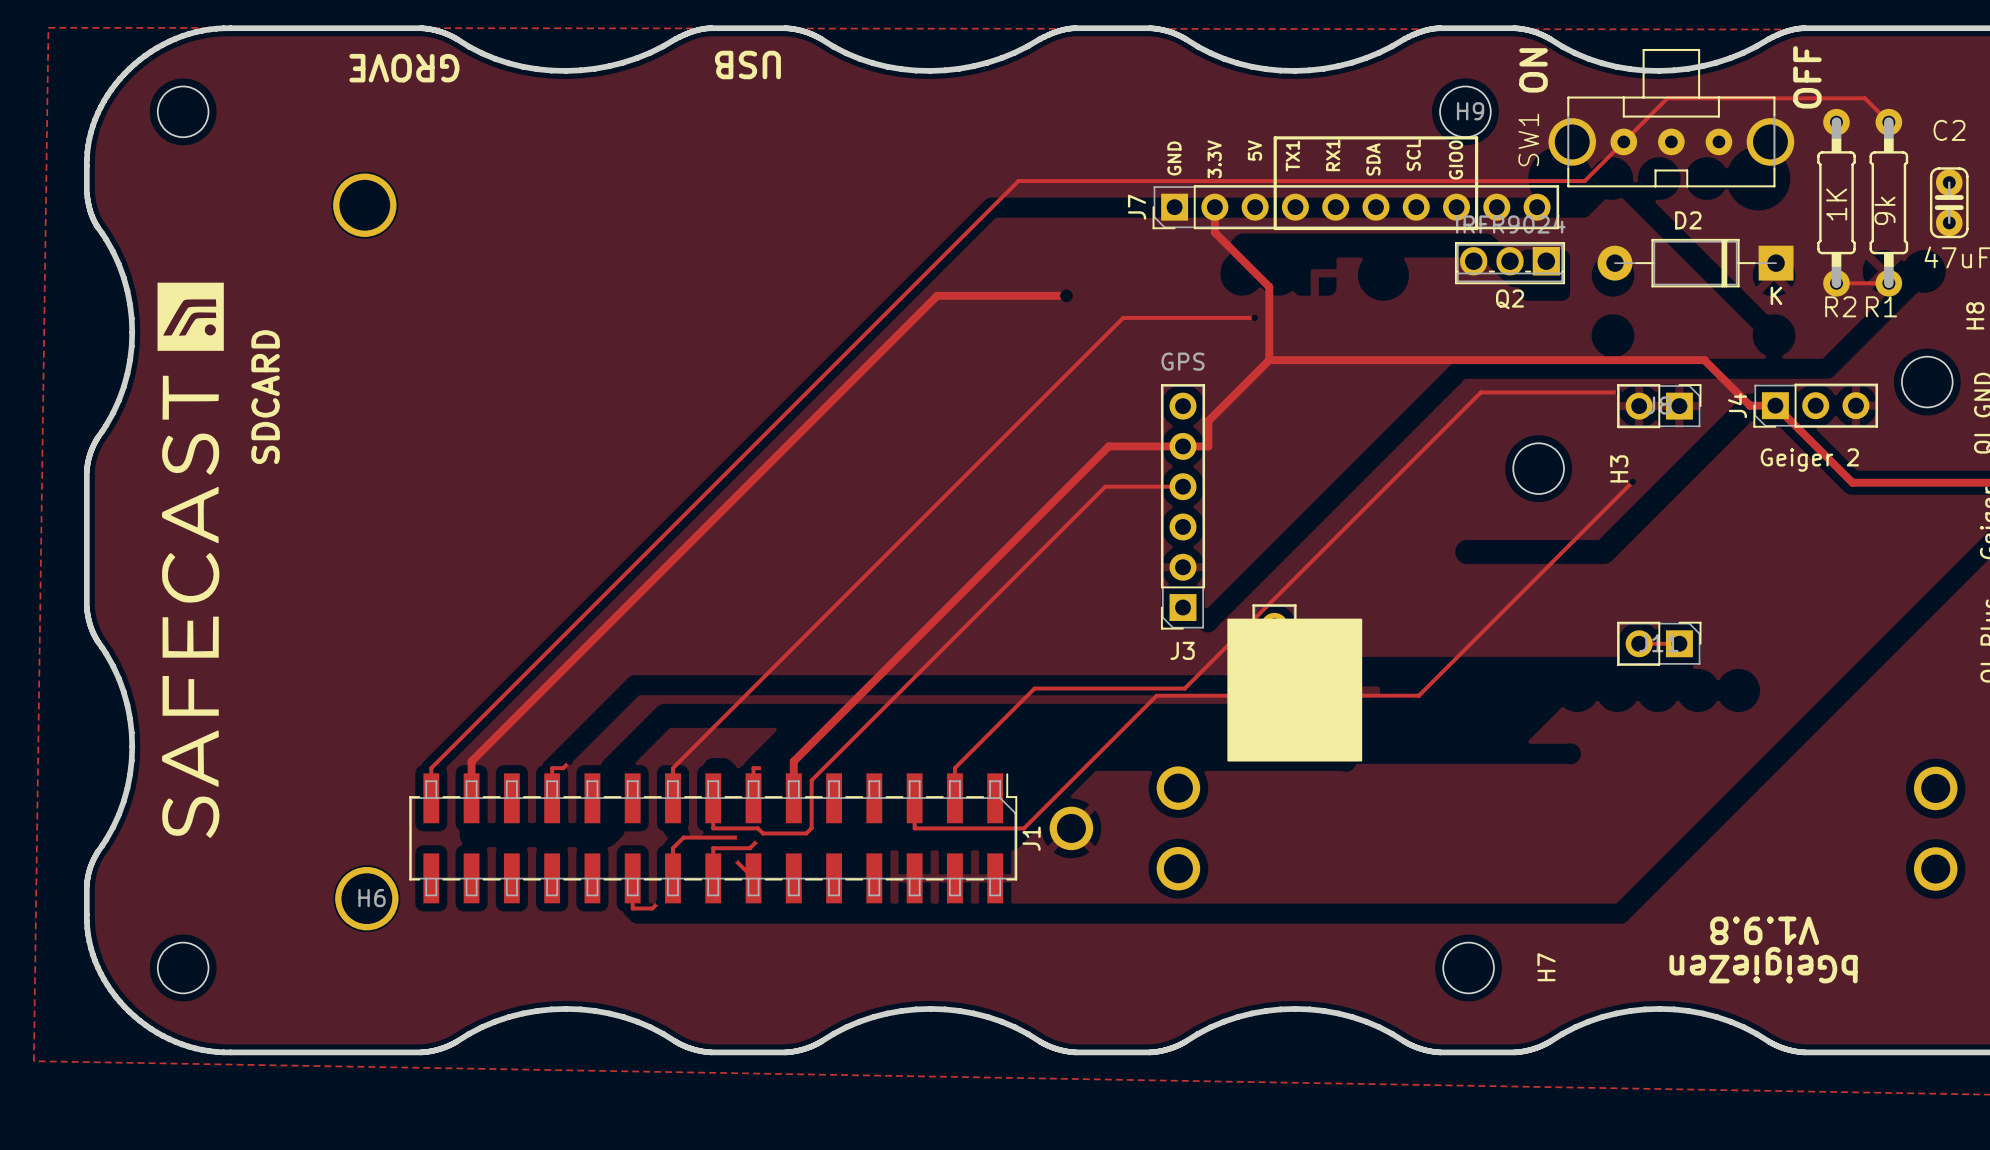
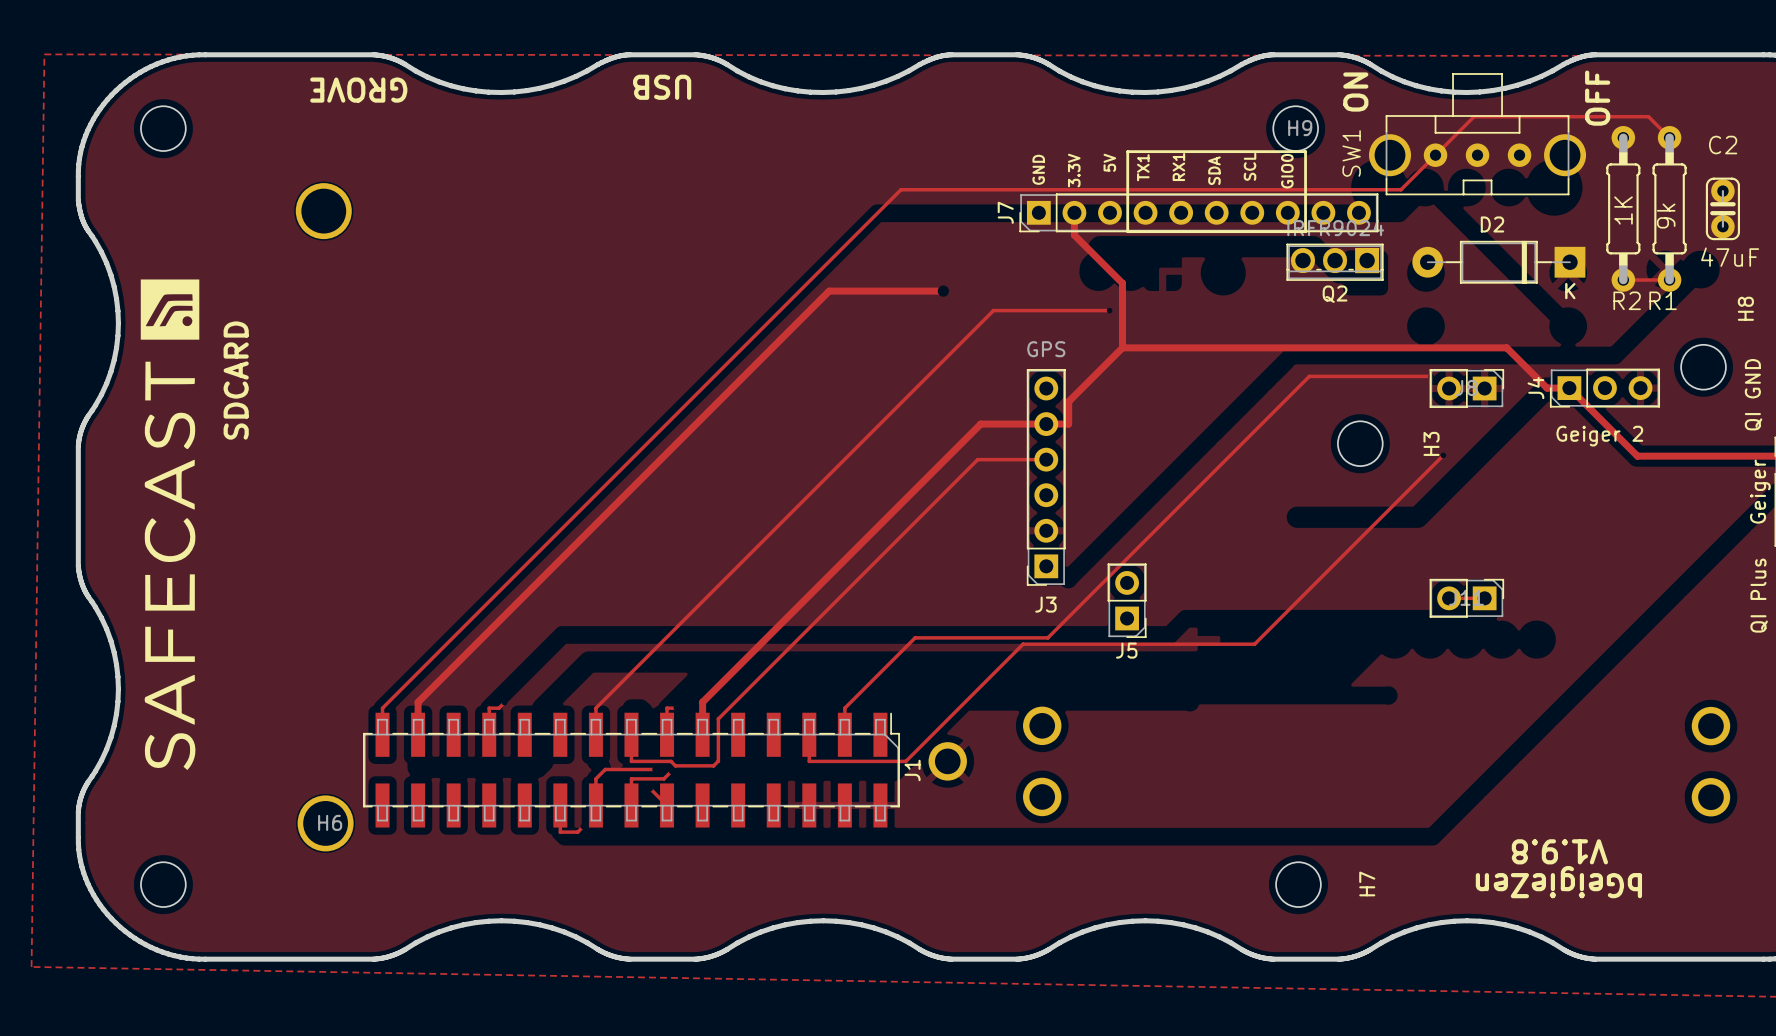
drawing: [1227, 618, 1363, 762] -> none

